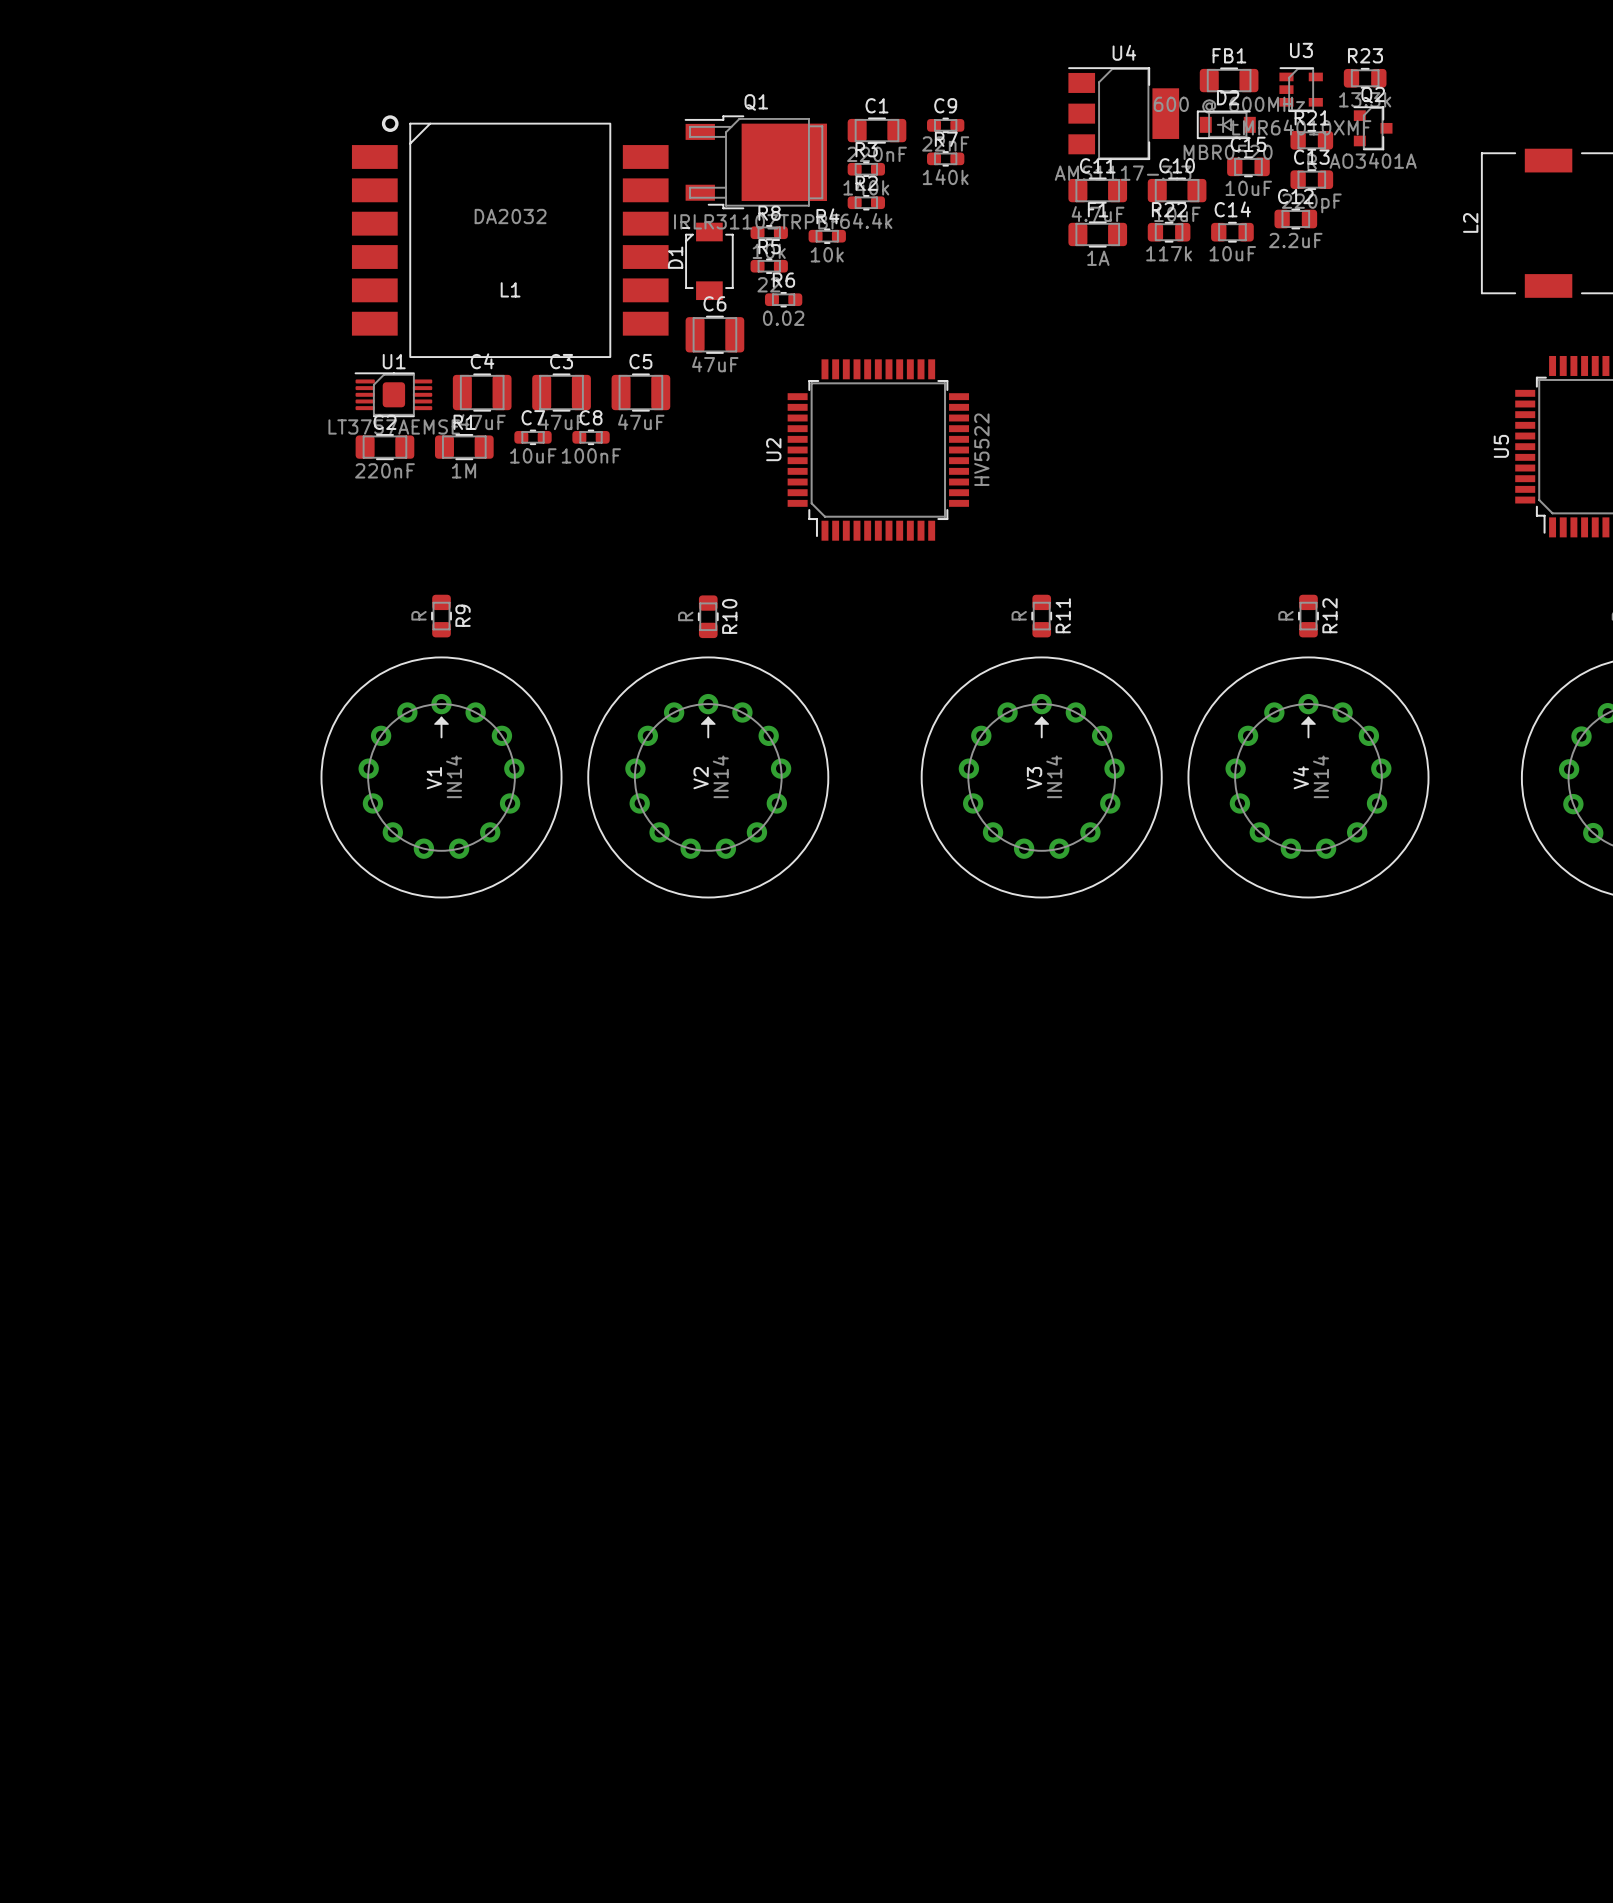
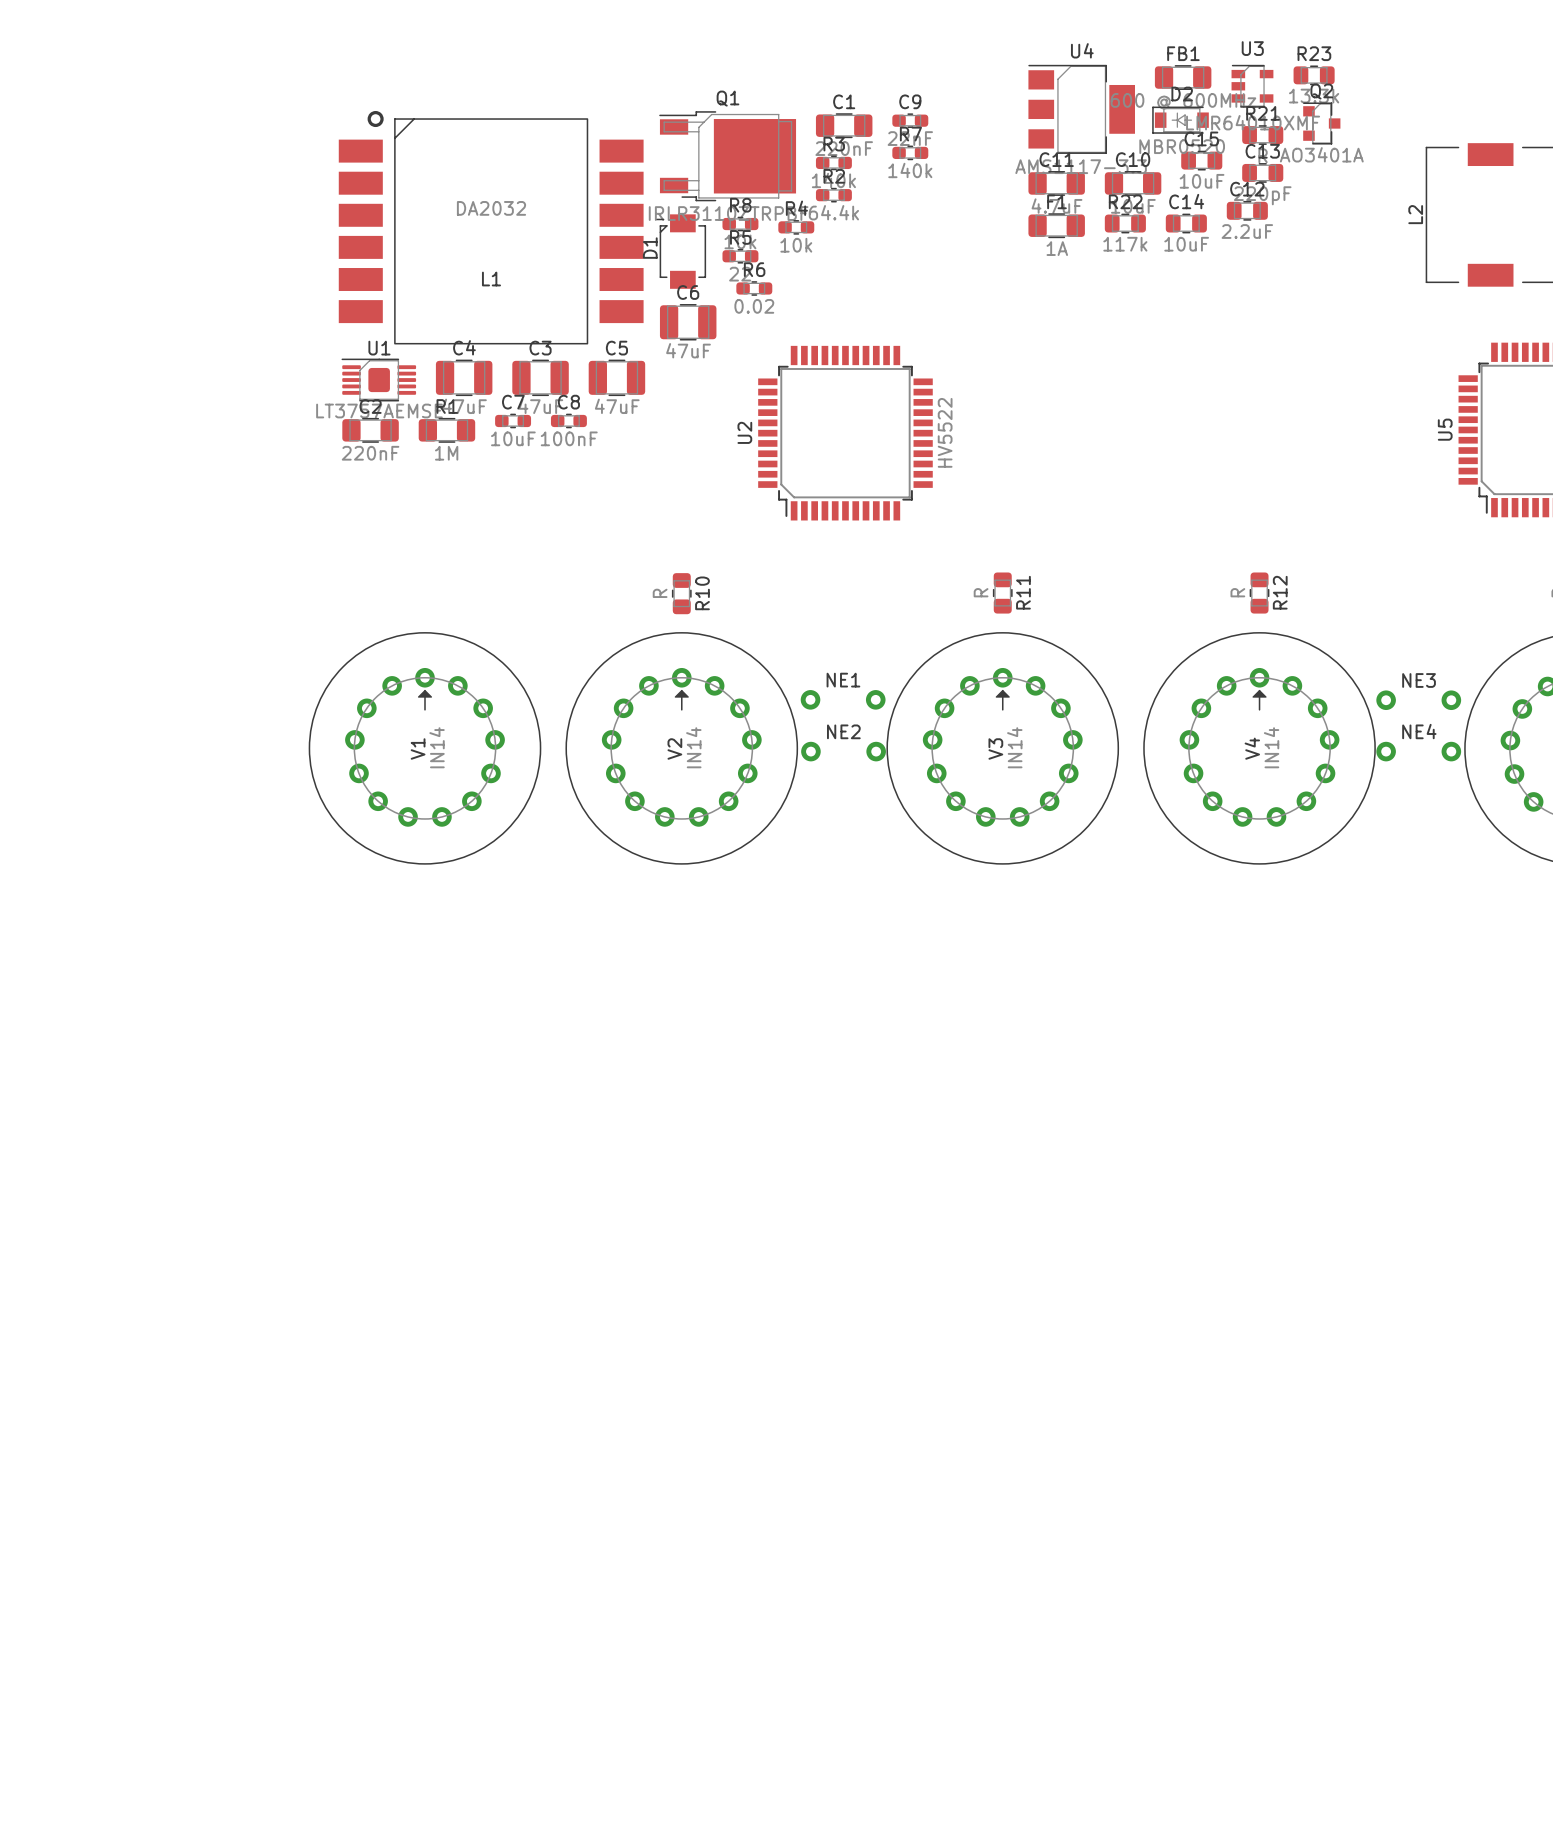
R9: R (441, 616) -> none
NE1: none -> (843, 699)
NE3: none -> (1418, 700)
NE2: none -> (843, 751)
NE4: none -> (1418, 751)

